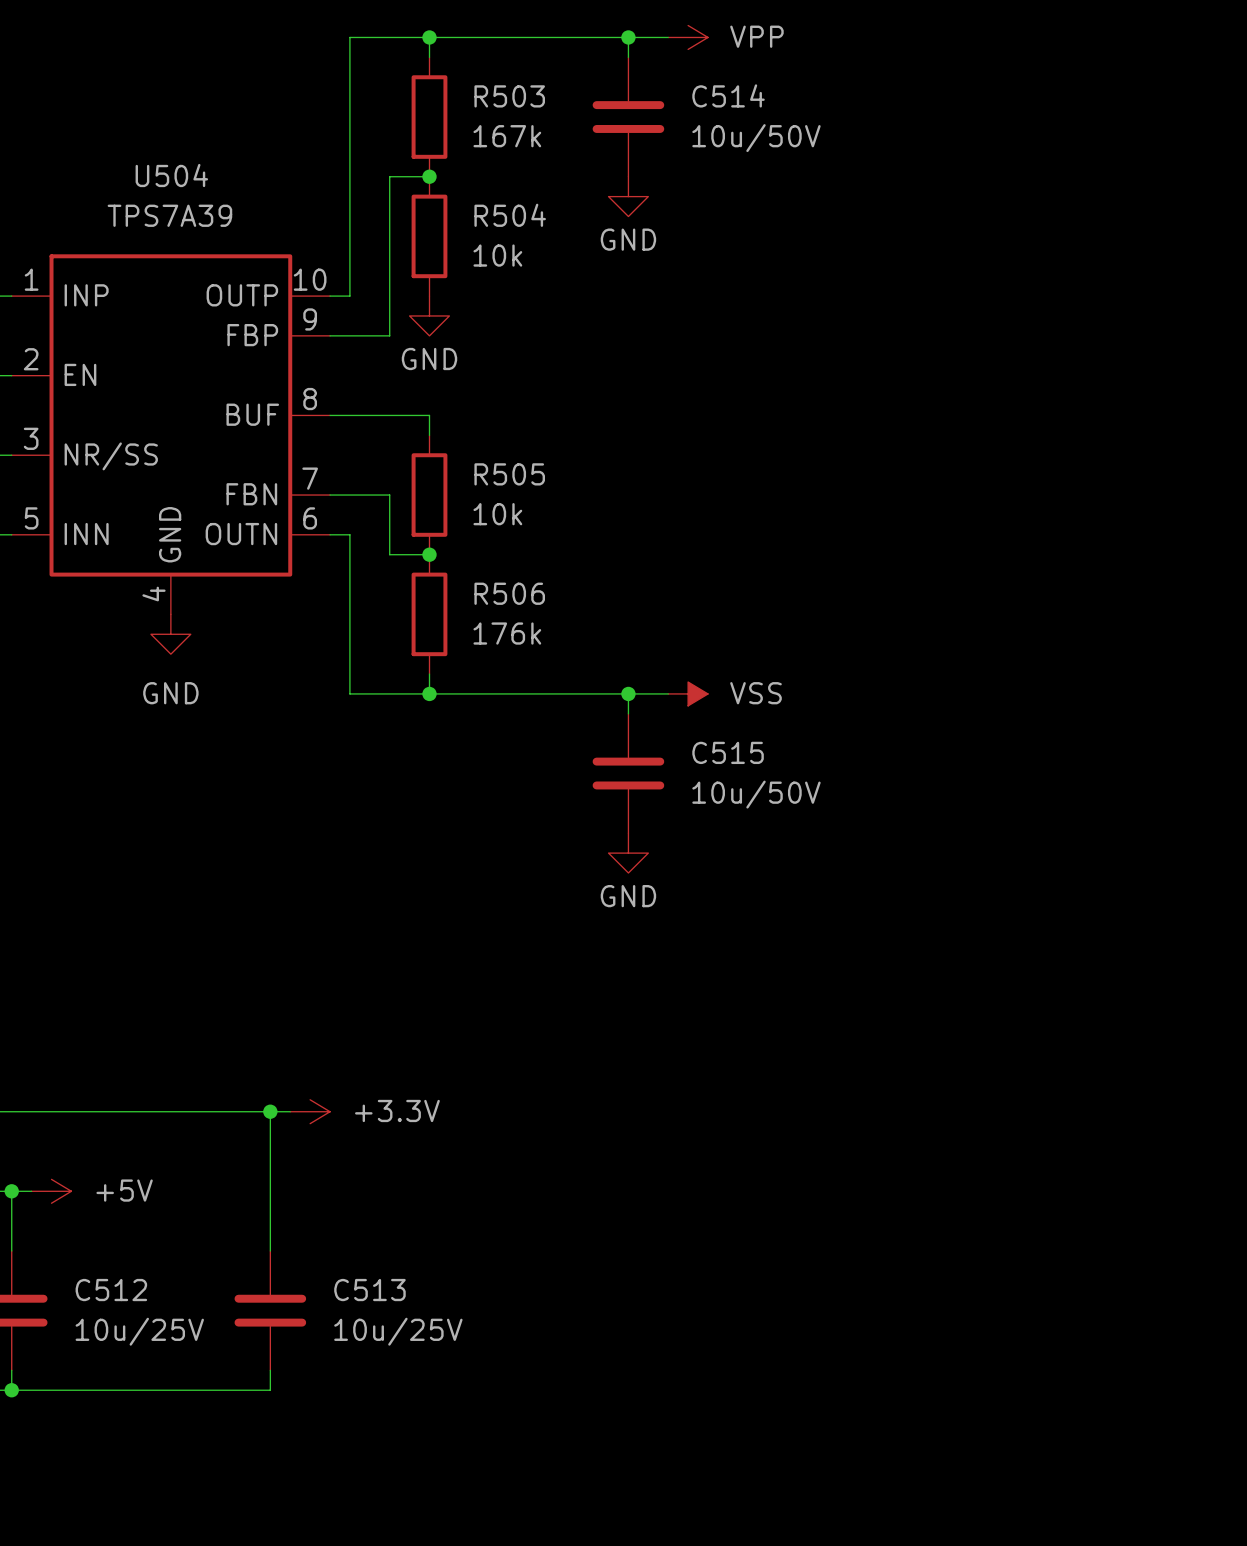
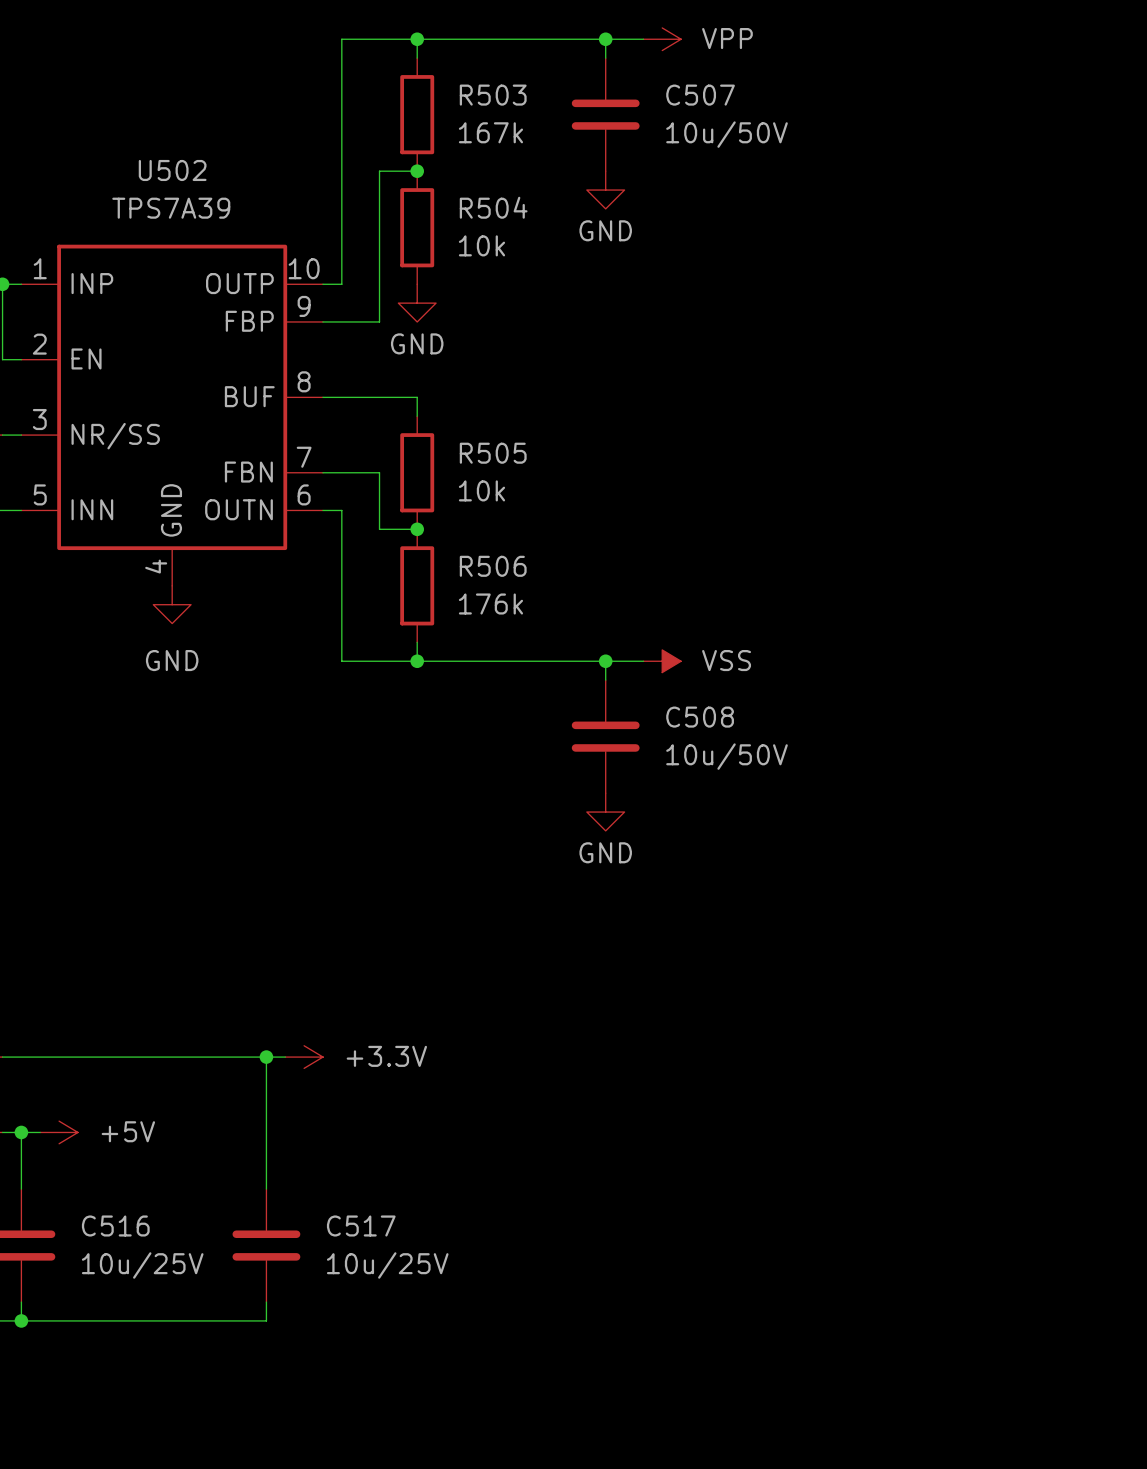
C514 name: C514 (728, 95) -> C507 (700, 95)
U504 name: U504 (171, 175) -> U502 (172, 170)
C515 name: C515 (728, 752) -> C508 (700, 717)
C512 name: C512 (111, 1290) -> C516 (115, 1226)
C513 name: C513 (369, 1290) -> C517 (361, 1226)

